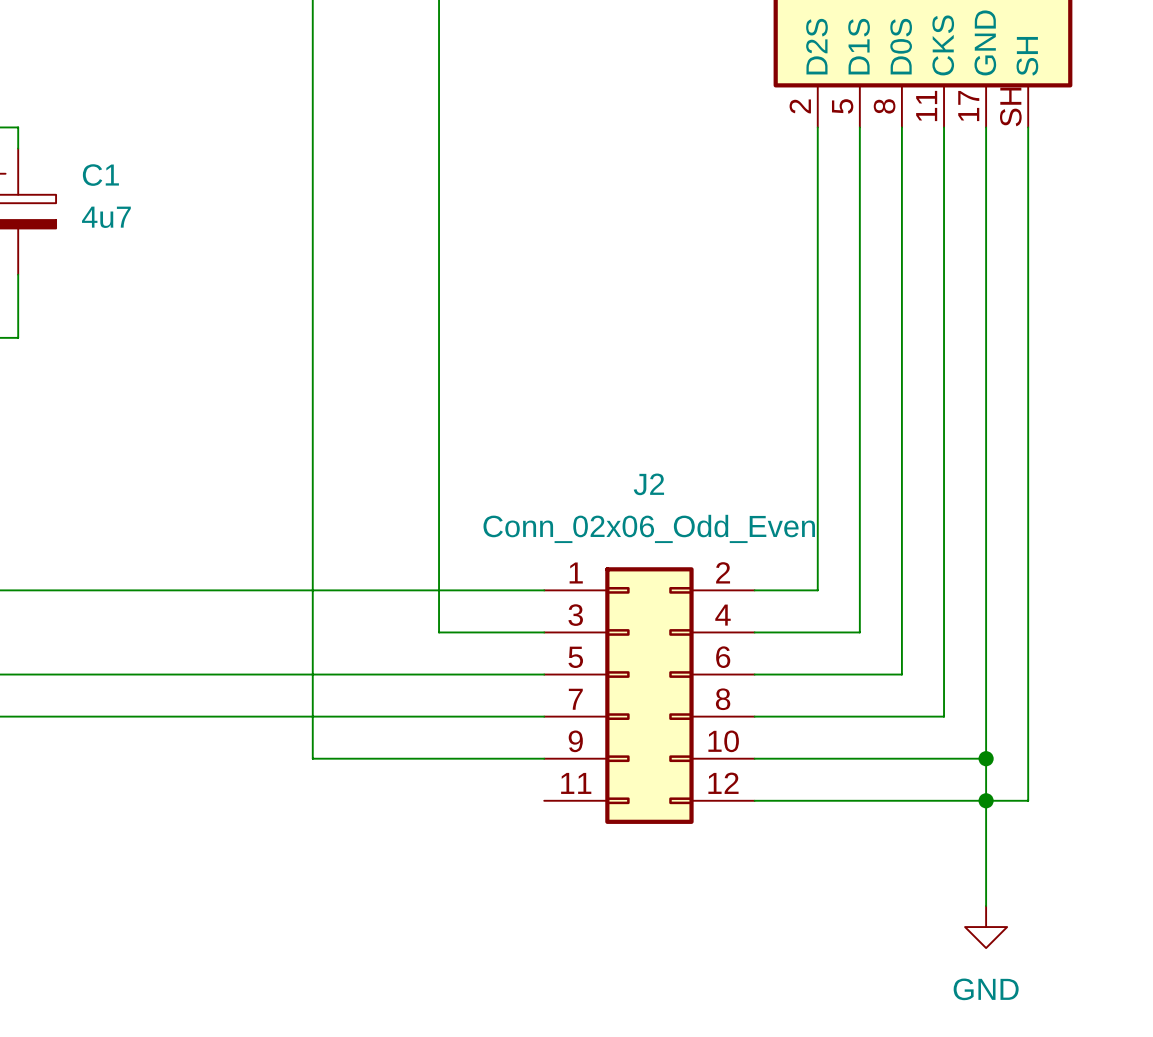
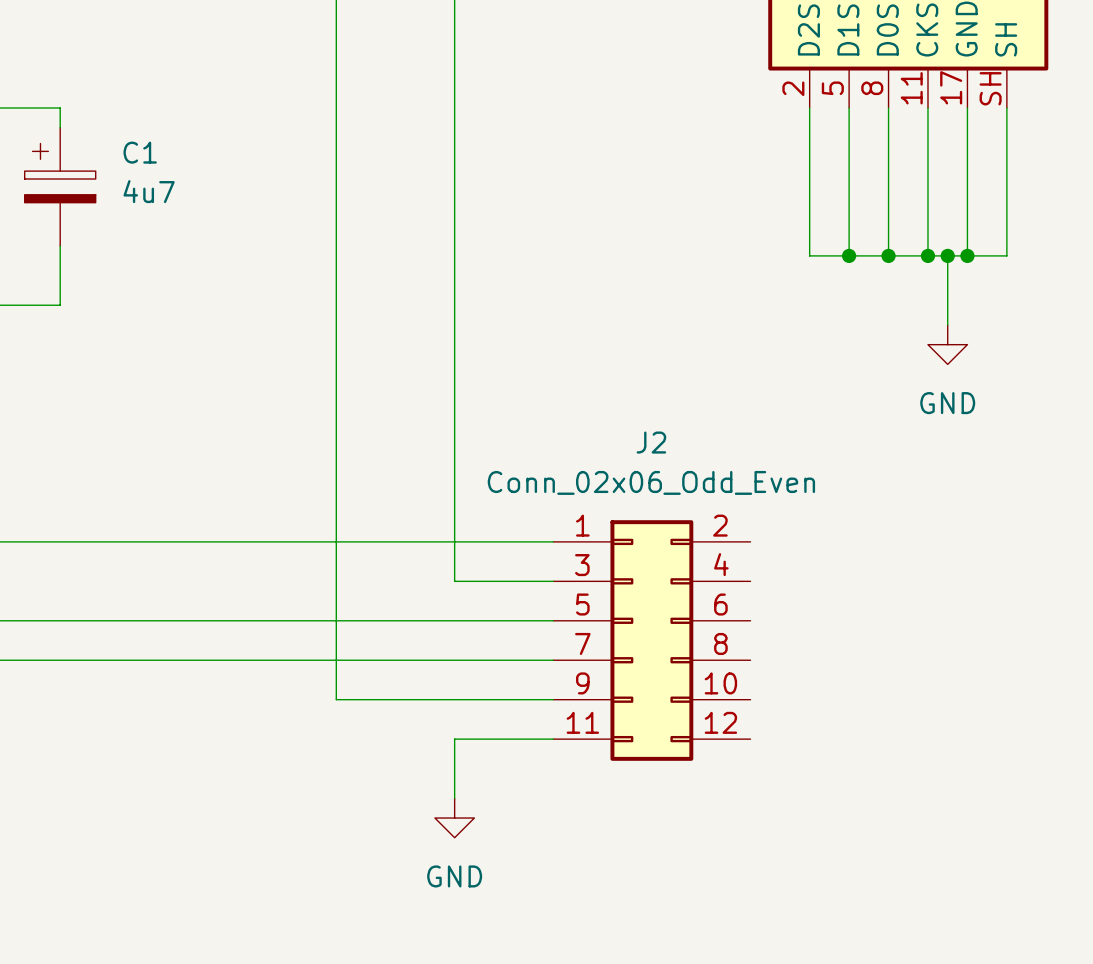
wire: (817, 285) (817, 590) (754, 590) -> (809, 255) (1006, 255)
wire: (859, 285) (859, 632) (754, 632) -> none
junction: none -> (849, 255)
wire: (901, 285) (901, 674) (754, 674) -> none
junction: none -> (888, 255)
wire: (944, 285) (944, 716) (754, 716) -> none
junction: none -> (927, 255)
wire: none -> (947, 255) (947, 324)
junction: none -> (947, 255)
wire: (986, 285) (986, 905) -> none
junction: none -> (967, 255)
wire: (1028, 285) (1028, 800) (754, 800) -> none
power symbol: none -> GND (947, 344)
wire: (754, 758) (986, 758) -> none
junction: (986, 758) -> none
wire: none -> (553, 739) (454, 739) (454, 798)
junction: (986, 800) -> none
power symbol: none -> GND (454, 818)
power symbol: GND (986, 927) -> none

